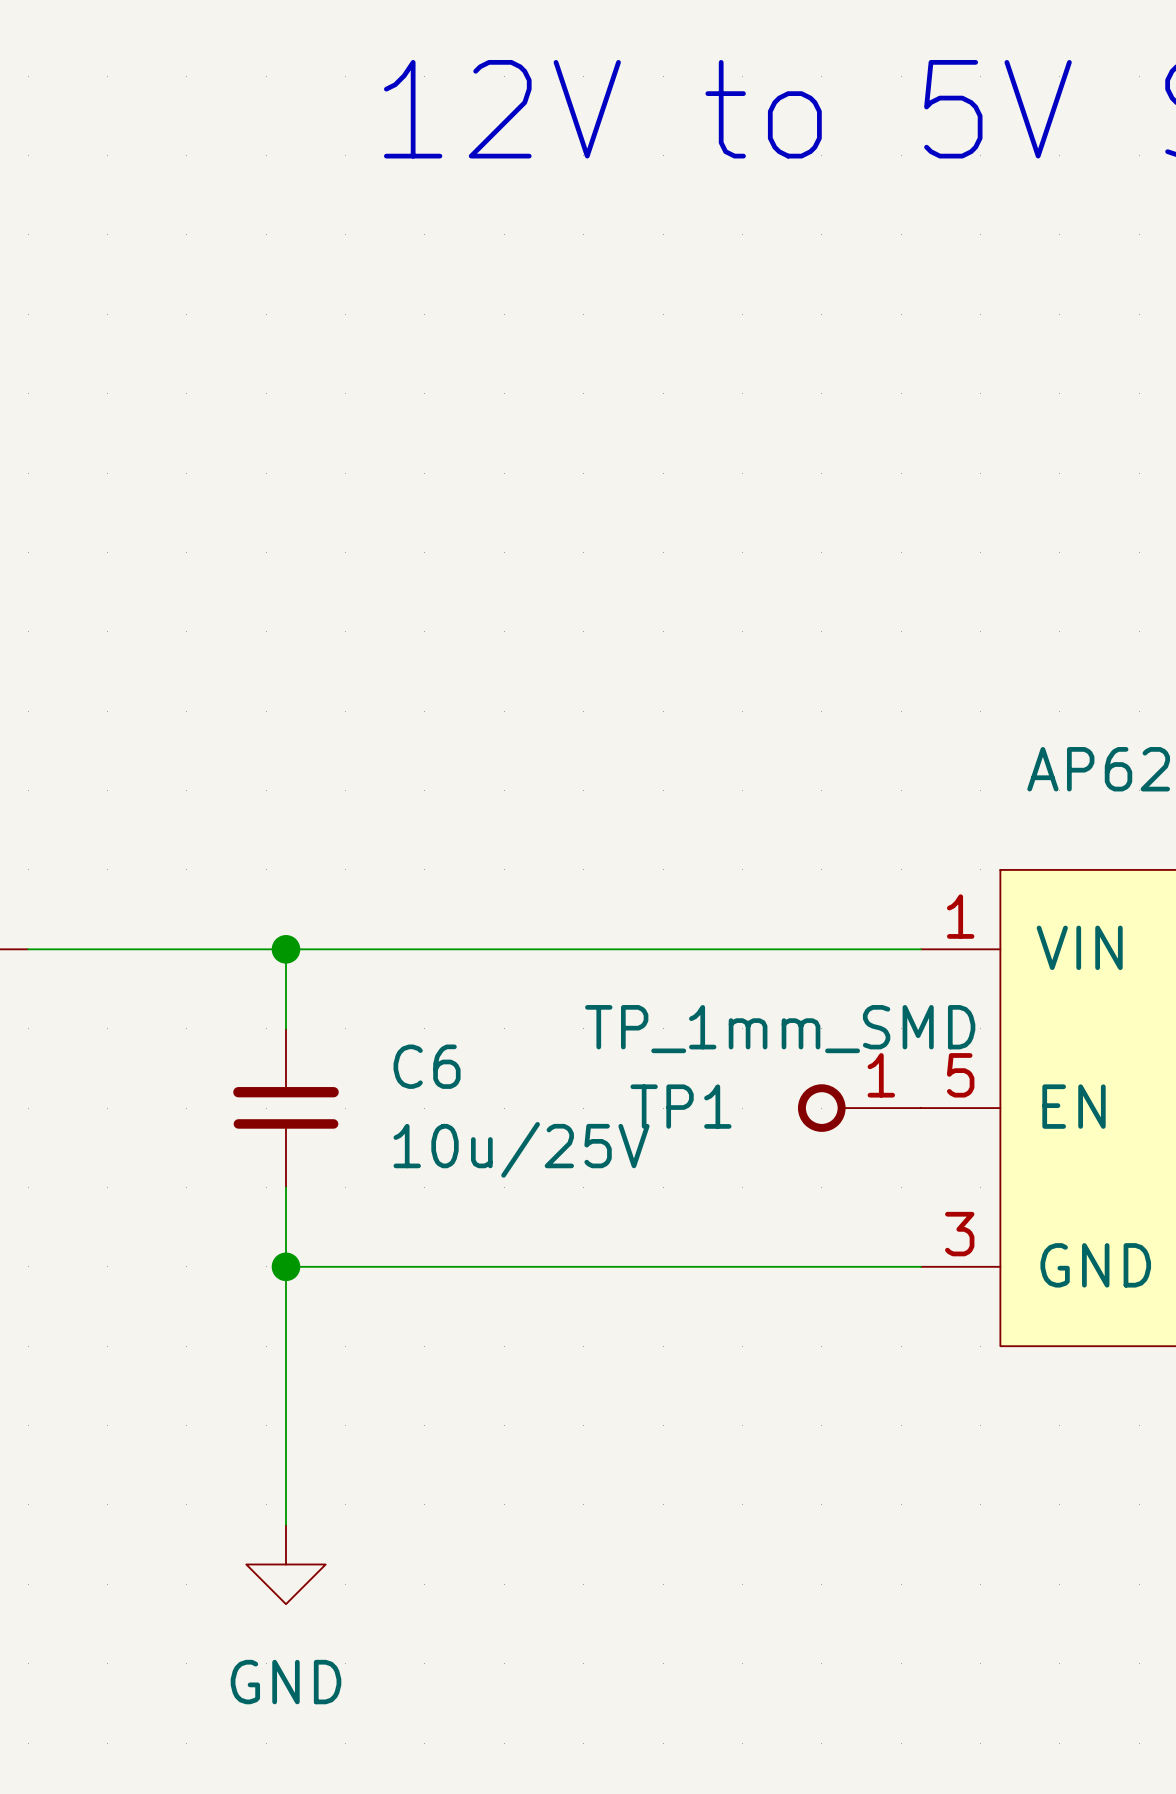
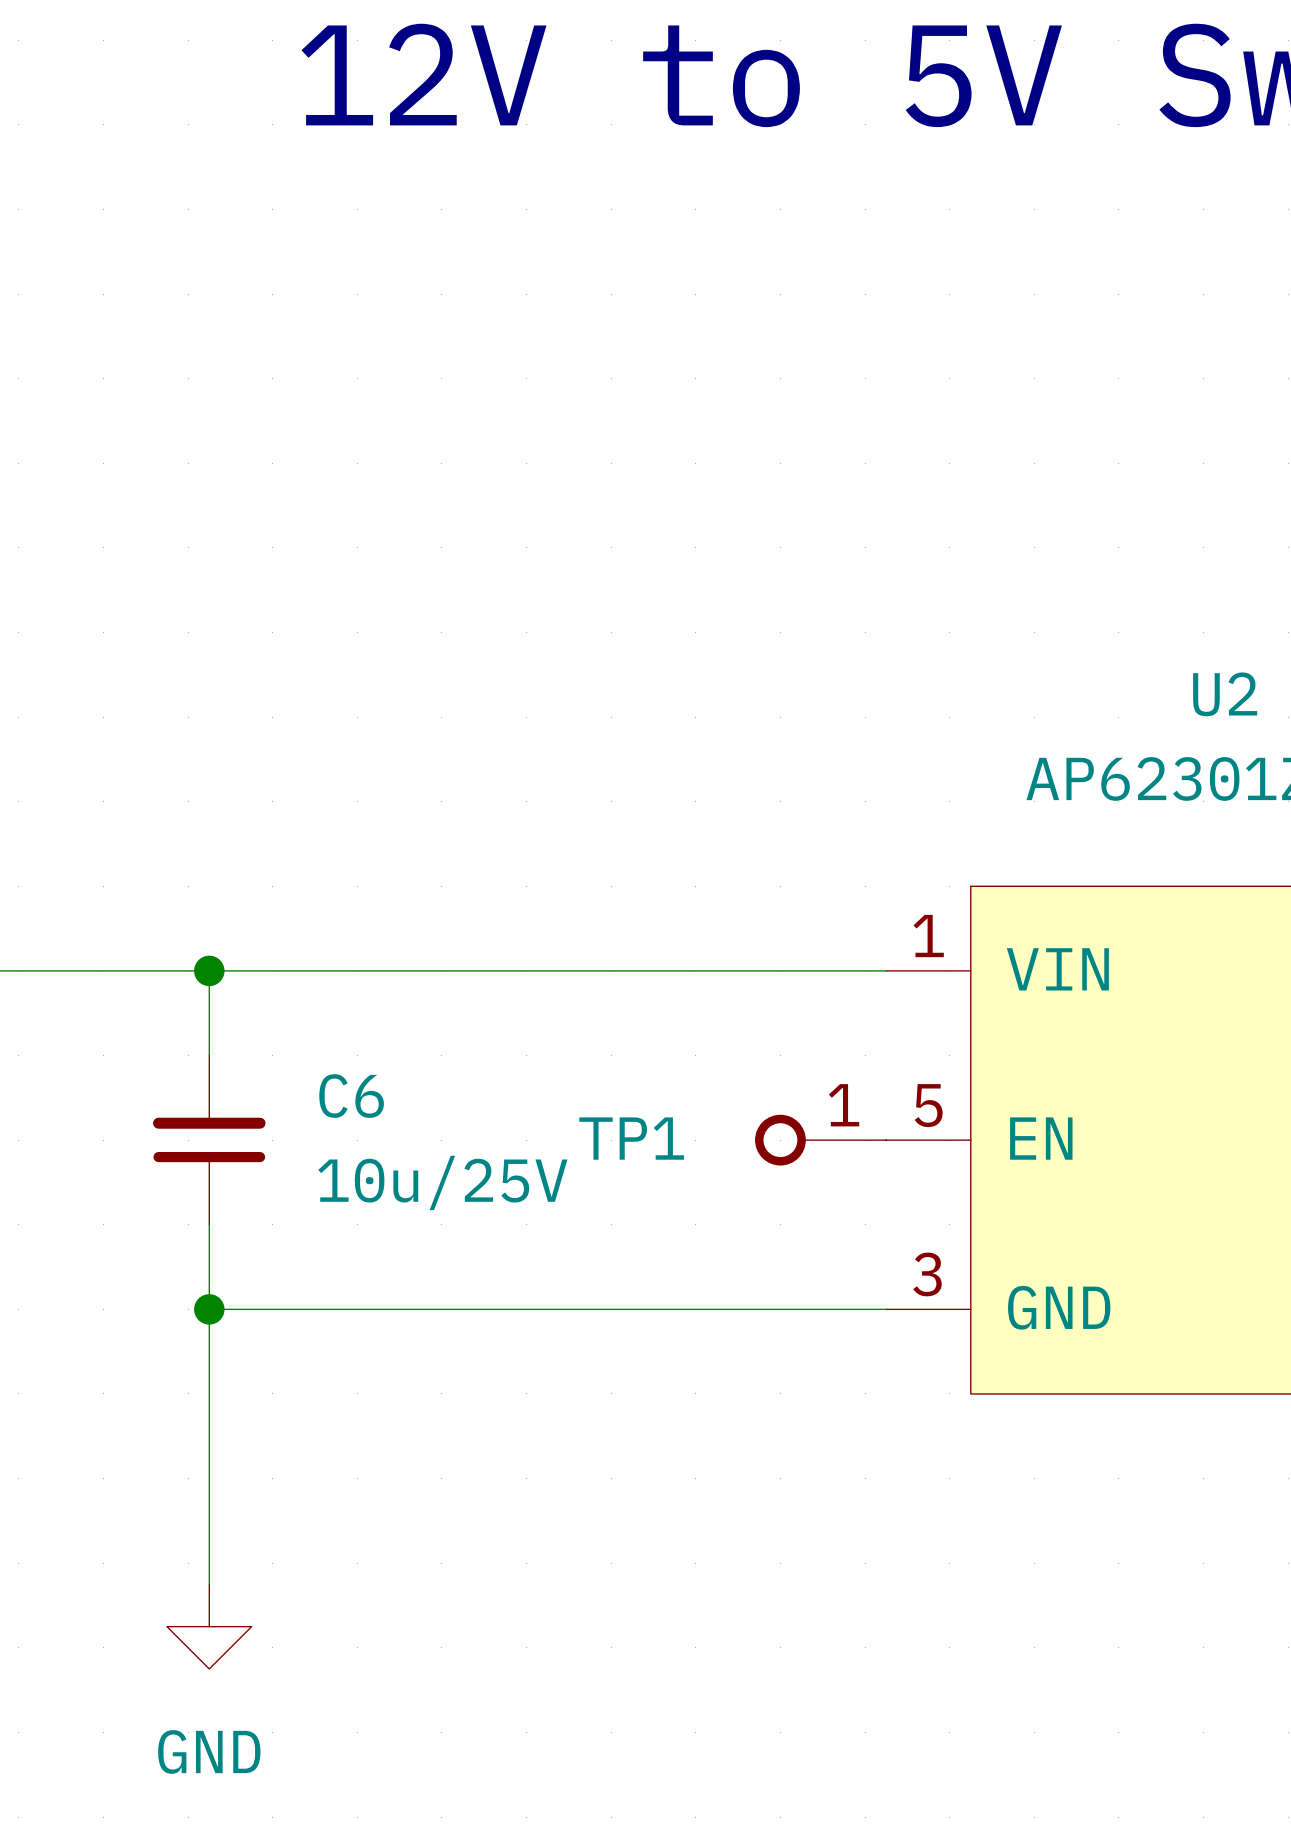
TP1 value: TP_1mm_SMD (780, 1029) -> none

